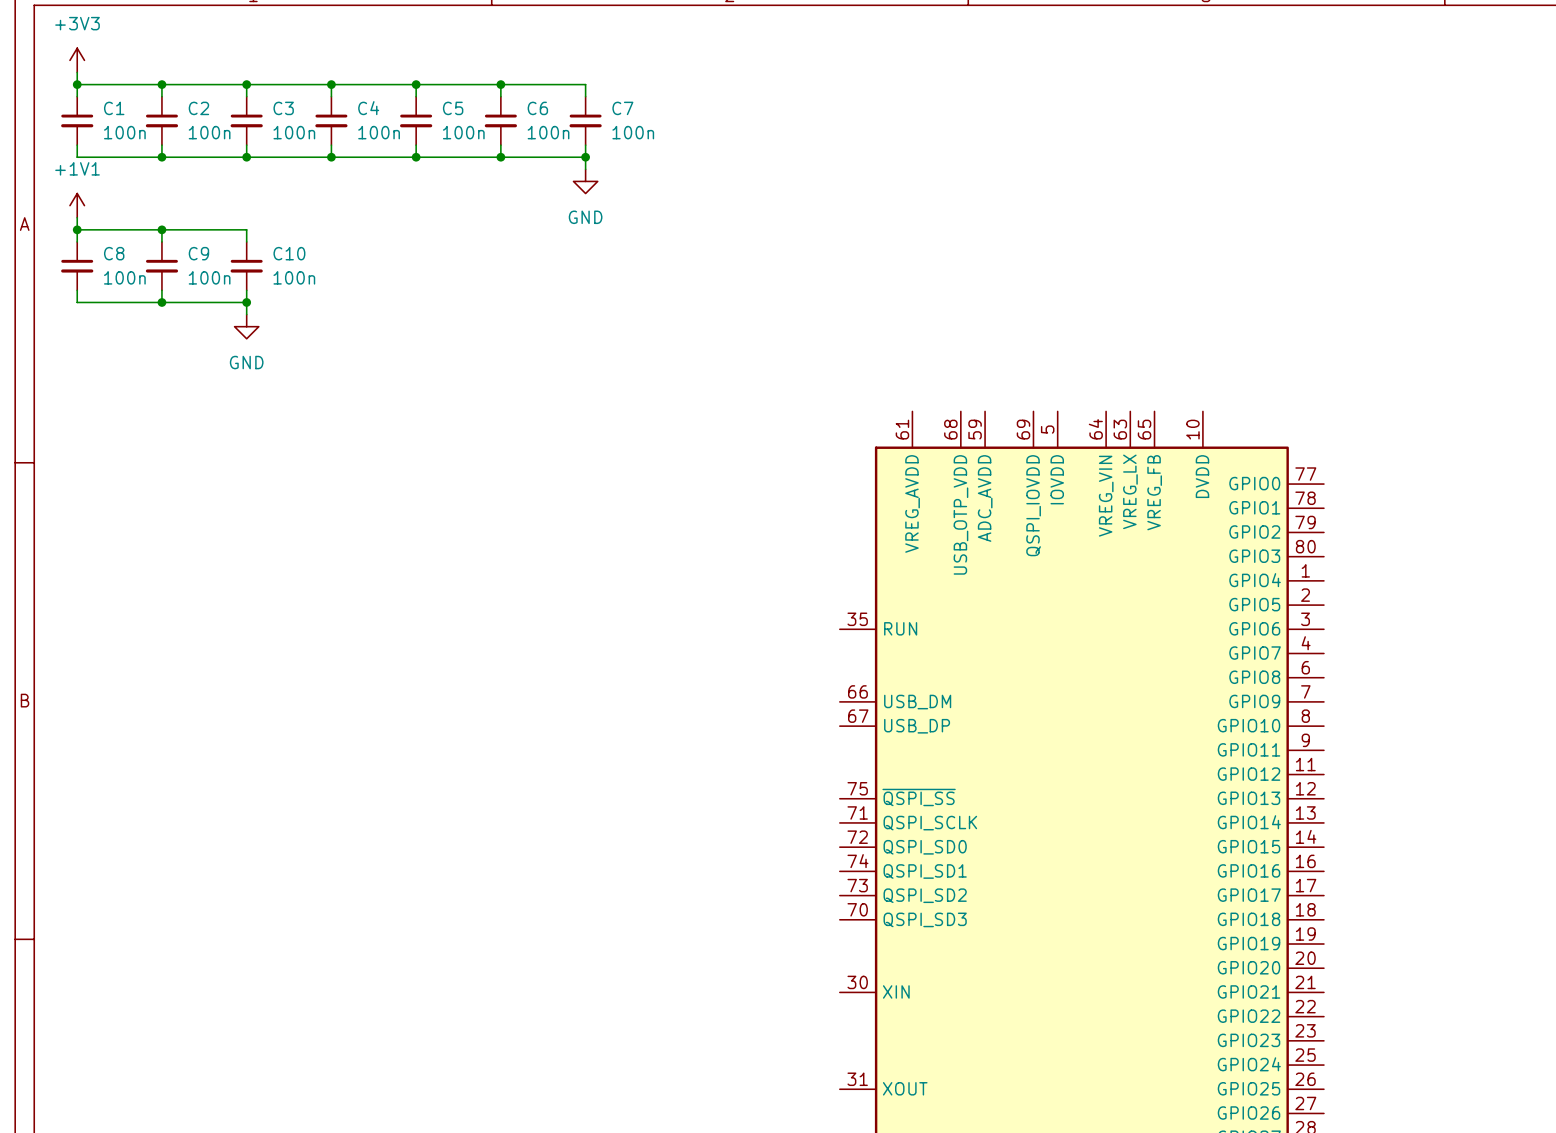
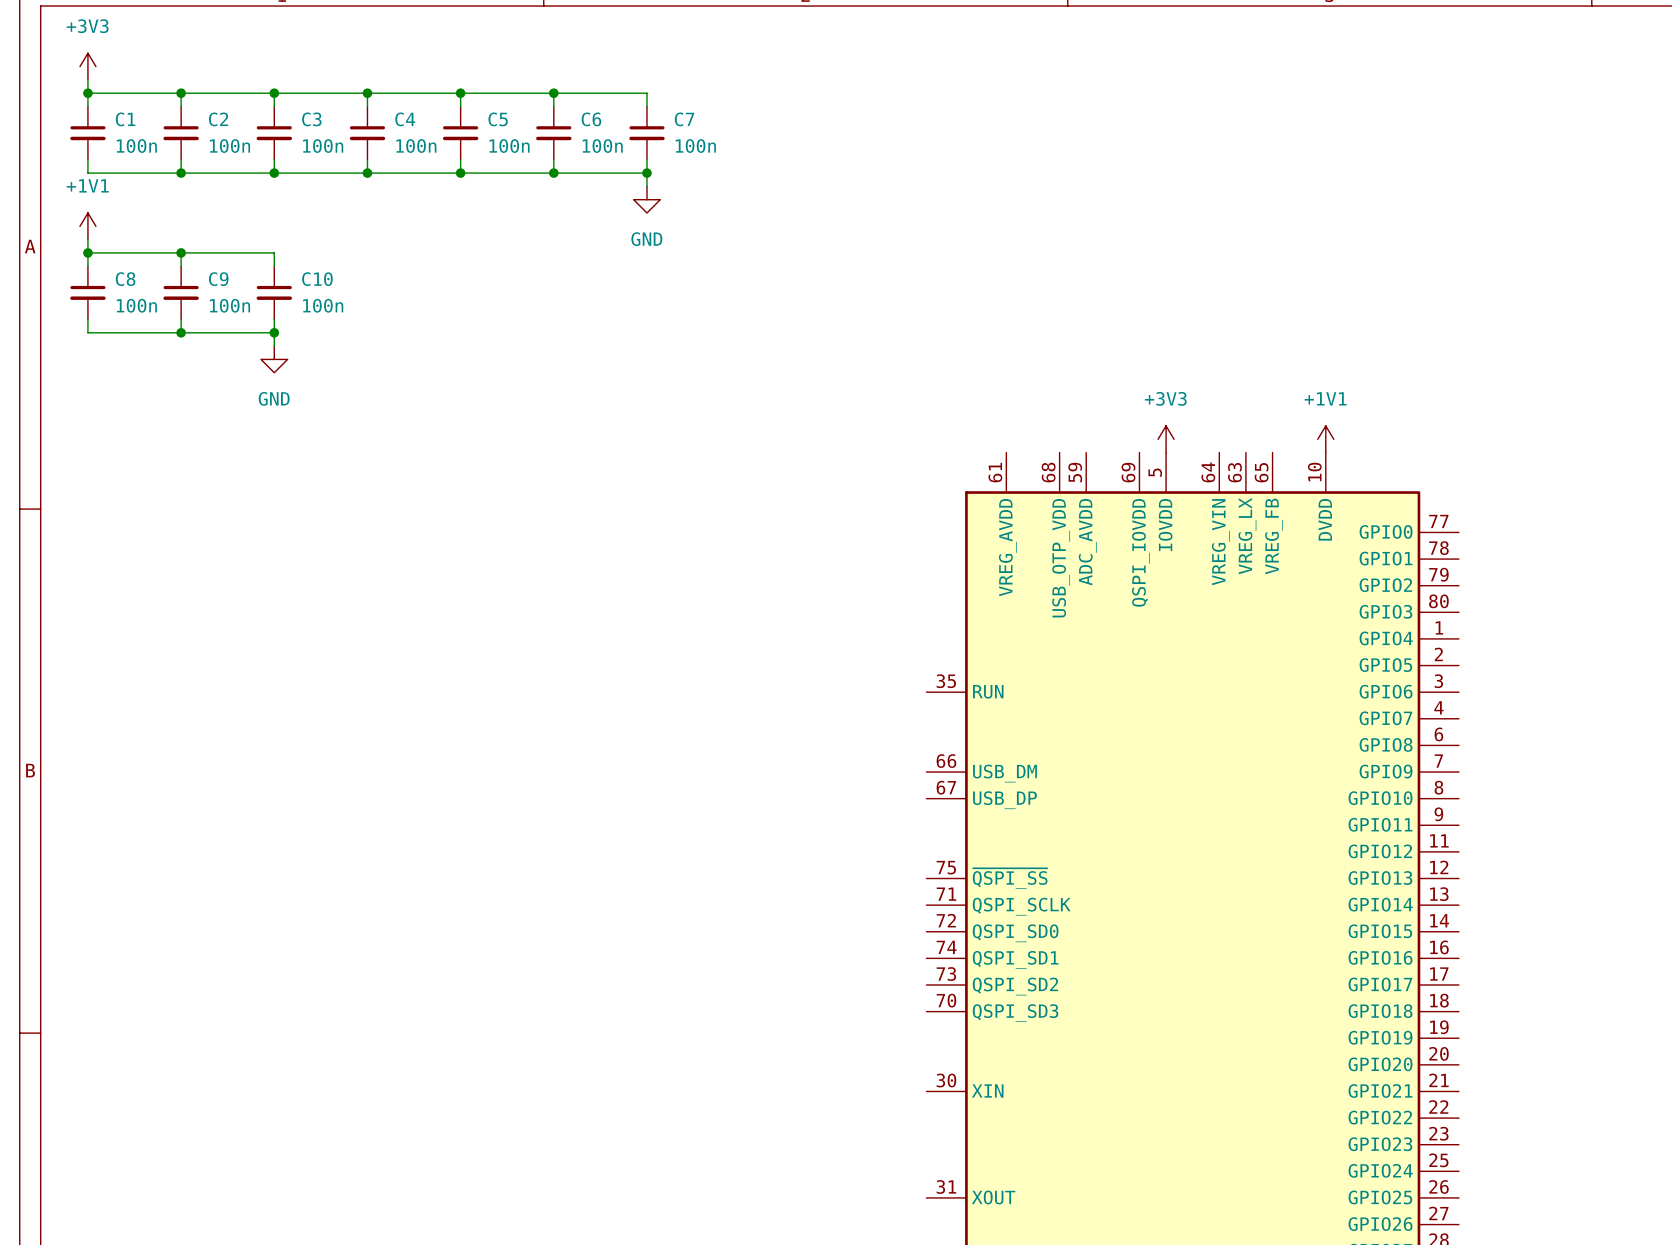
power symbol: none -> +3V3 (1166, 439)
power symbol: none -> +1V1 (1325, 439)

